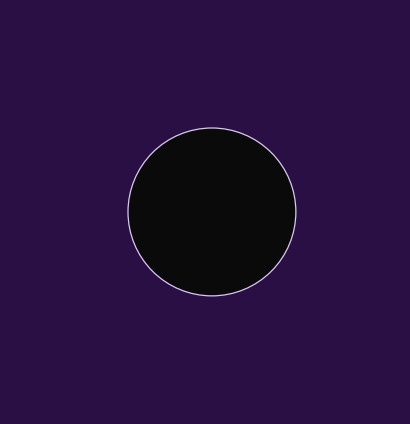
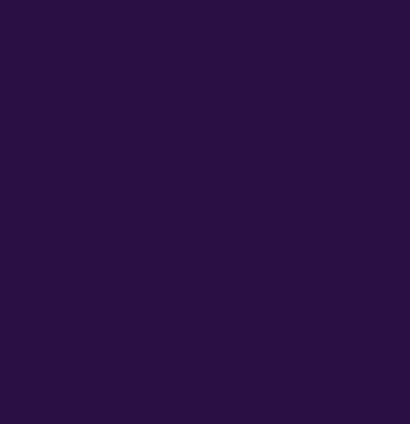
part: (211, 211) -> none

